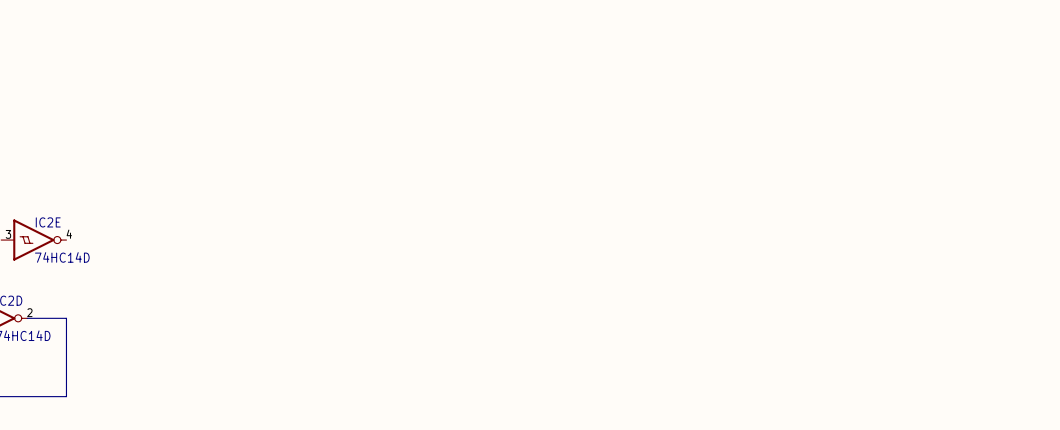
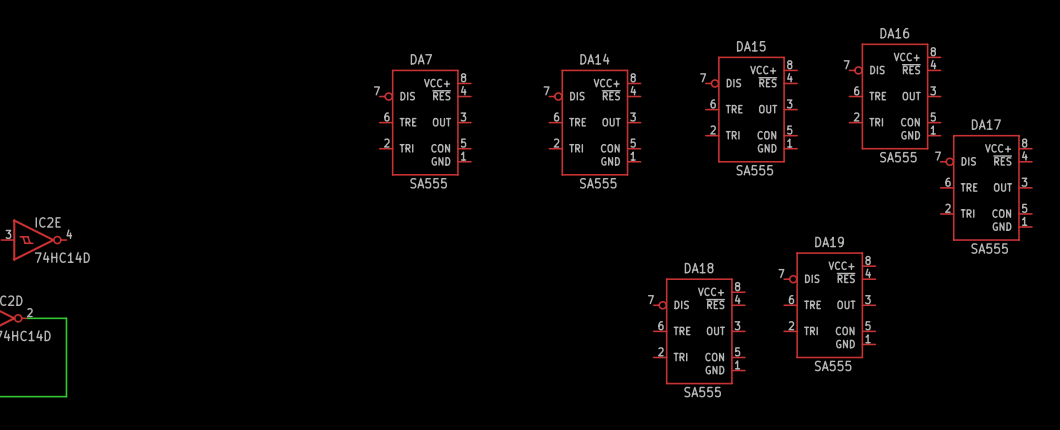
DA16: none -> SA555 (895, 96)
DA15: none -> SA555 (751, 109)
DA7: none -> SA555 (425, 122)
DA14: none -> SA555 (594, 122)
DA17: none -> SA555 (986, 187)
DA19: none -> SA555 (829, 305)
DA18: none -> SA555 (699, 331)

